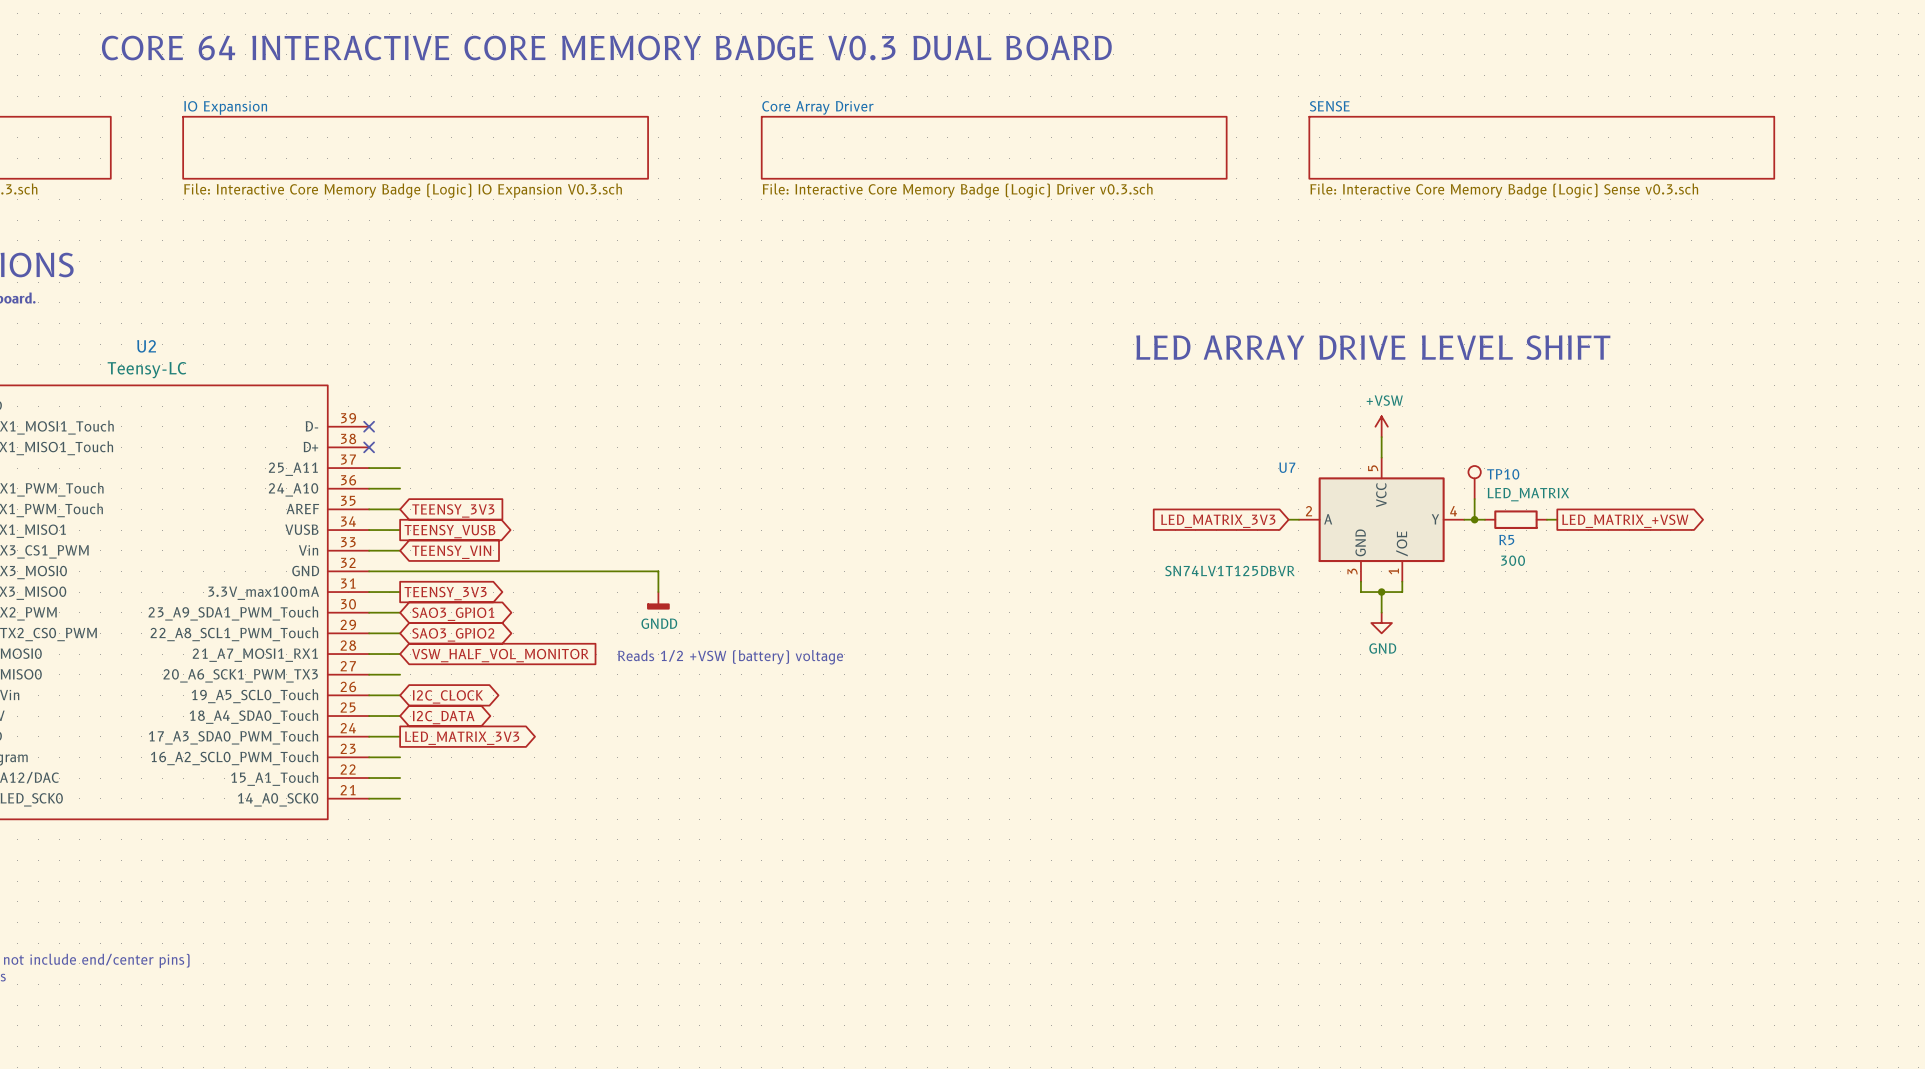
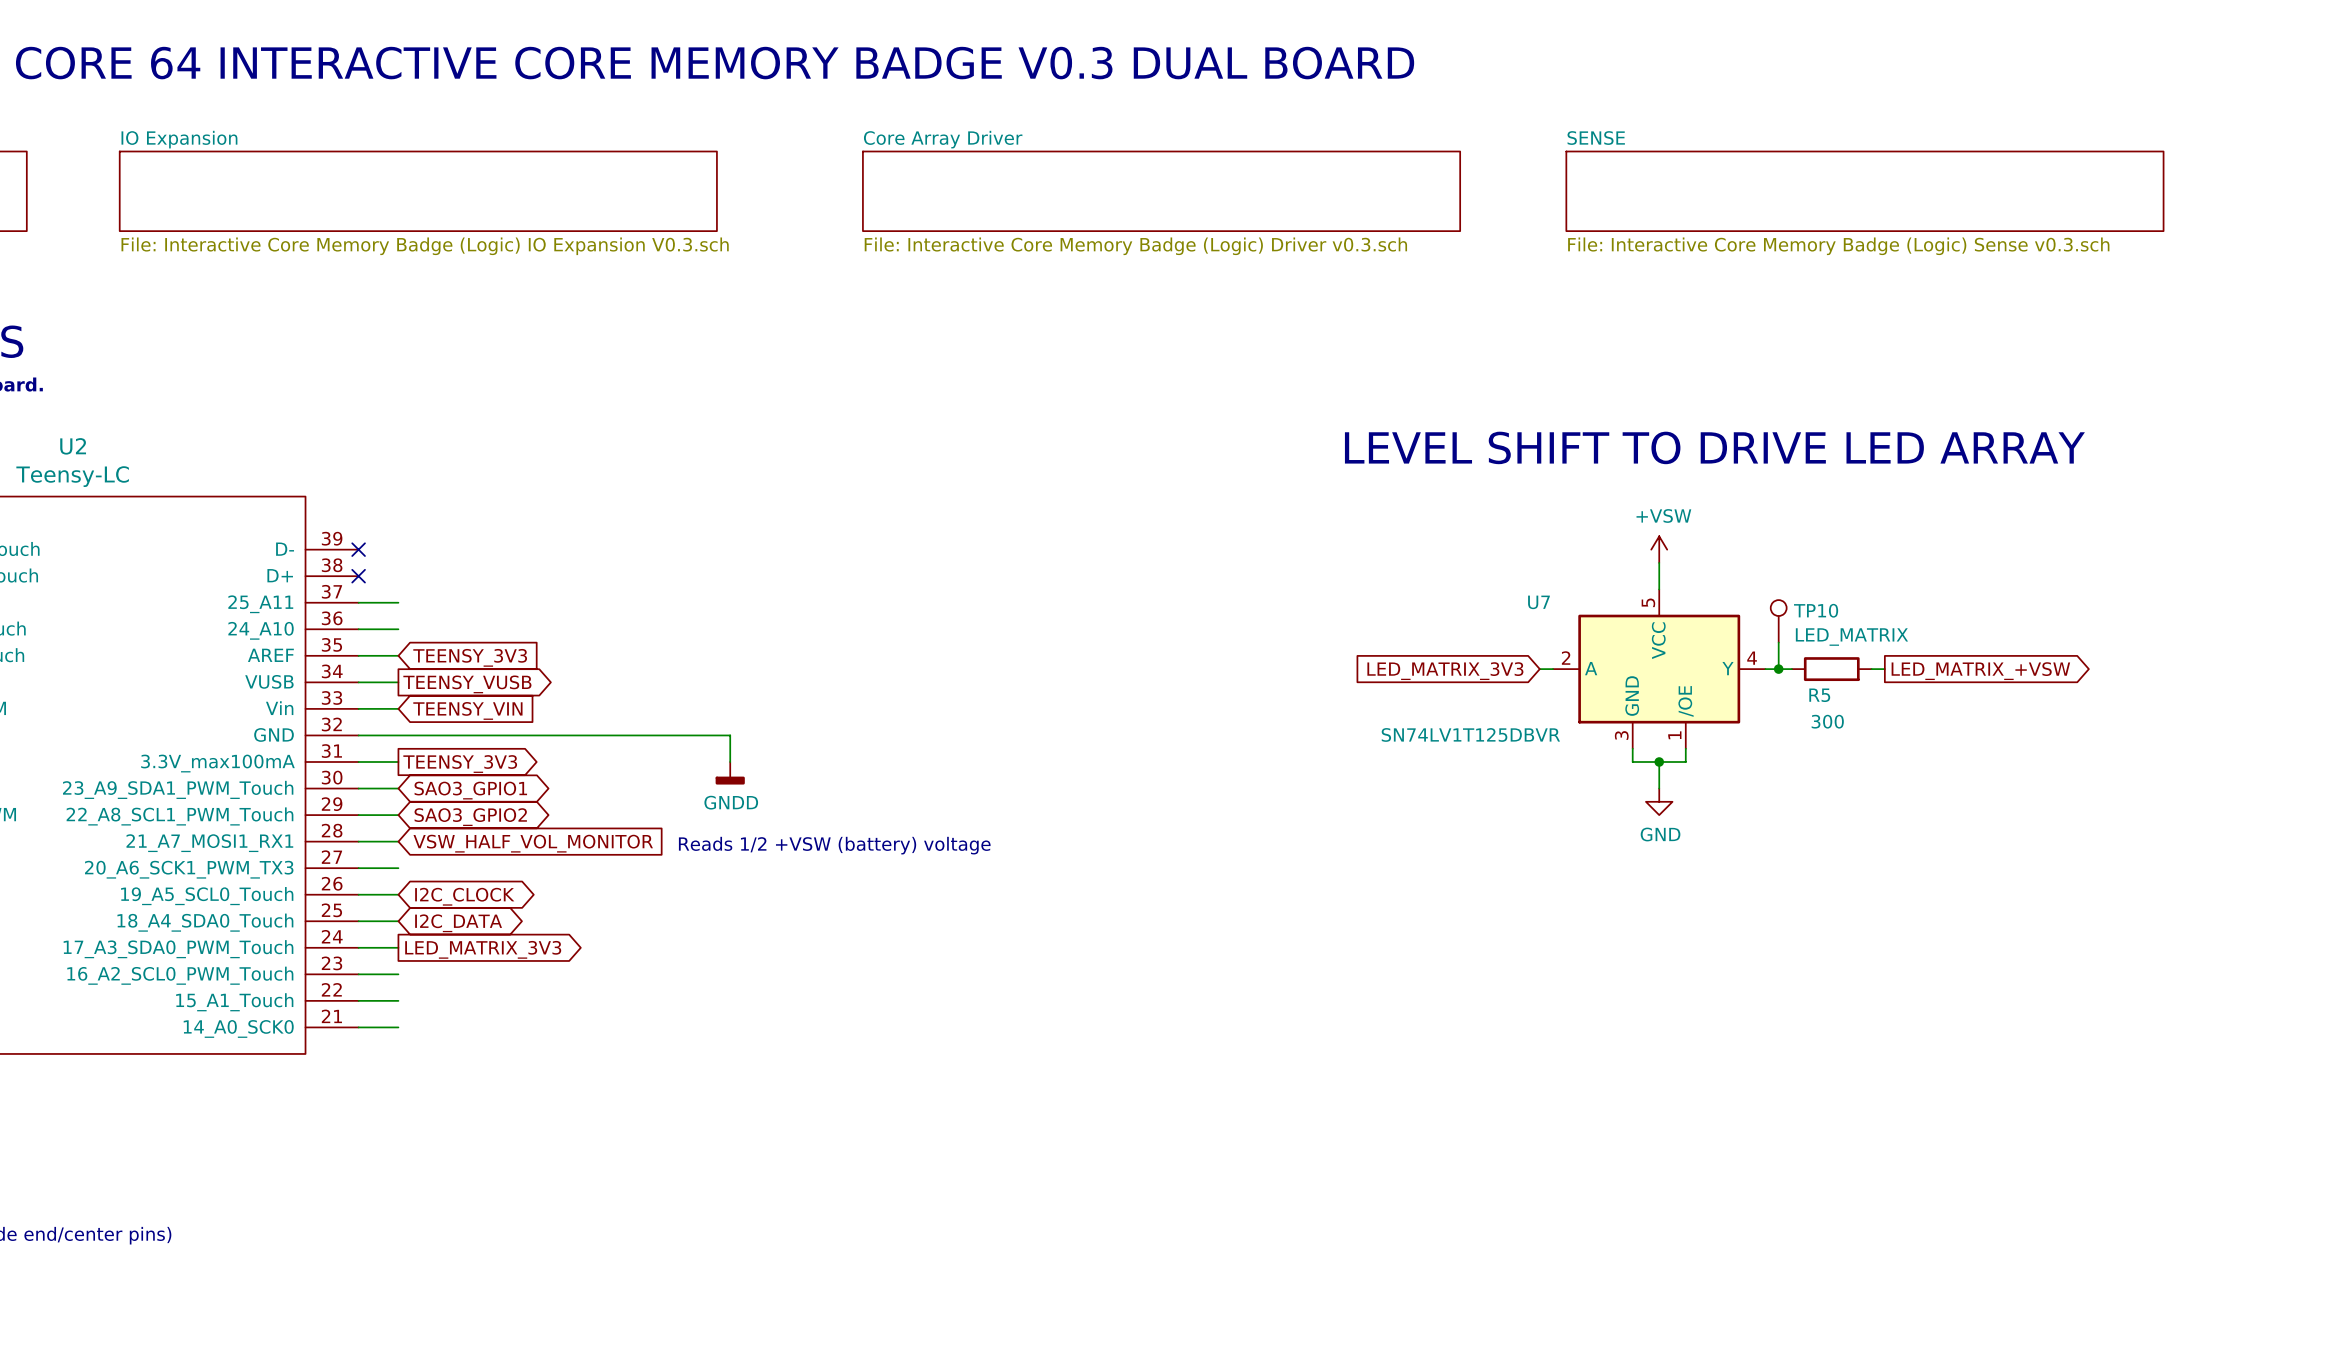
text: LED ARRAY DRIVE LEVEL SHIFT (1373, 347) -> LEVEL SHIFT TO DRIVE LED ARRAY (1714, 447)

